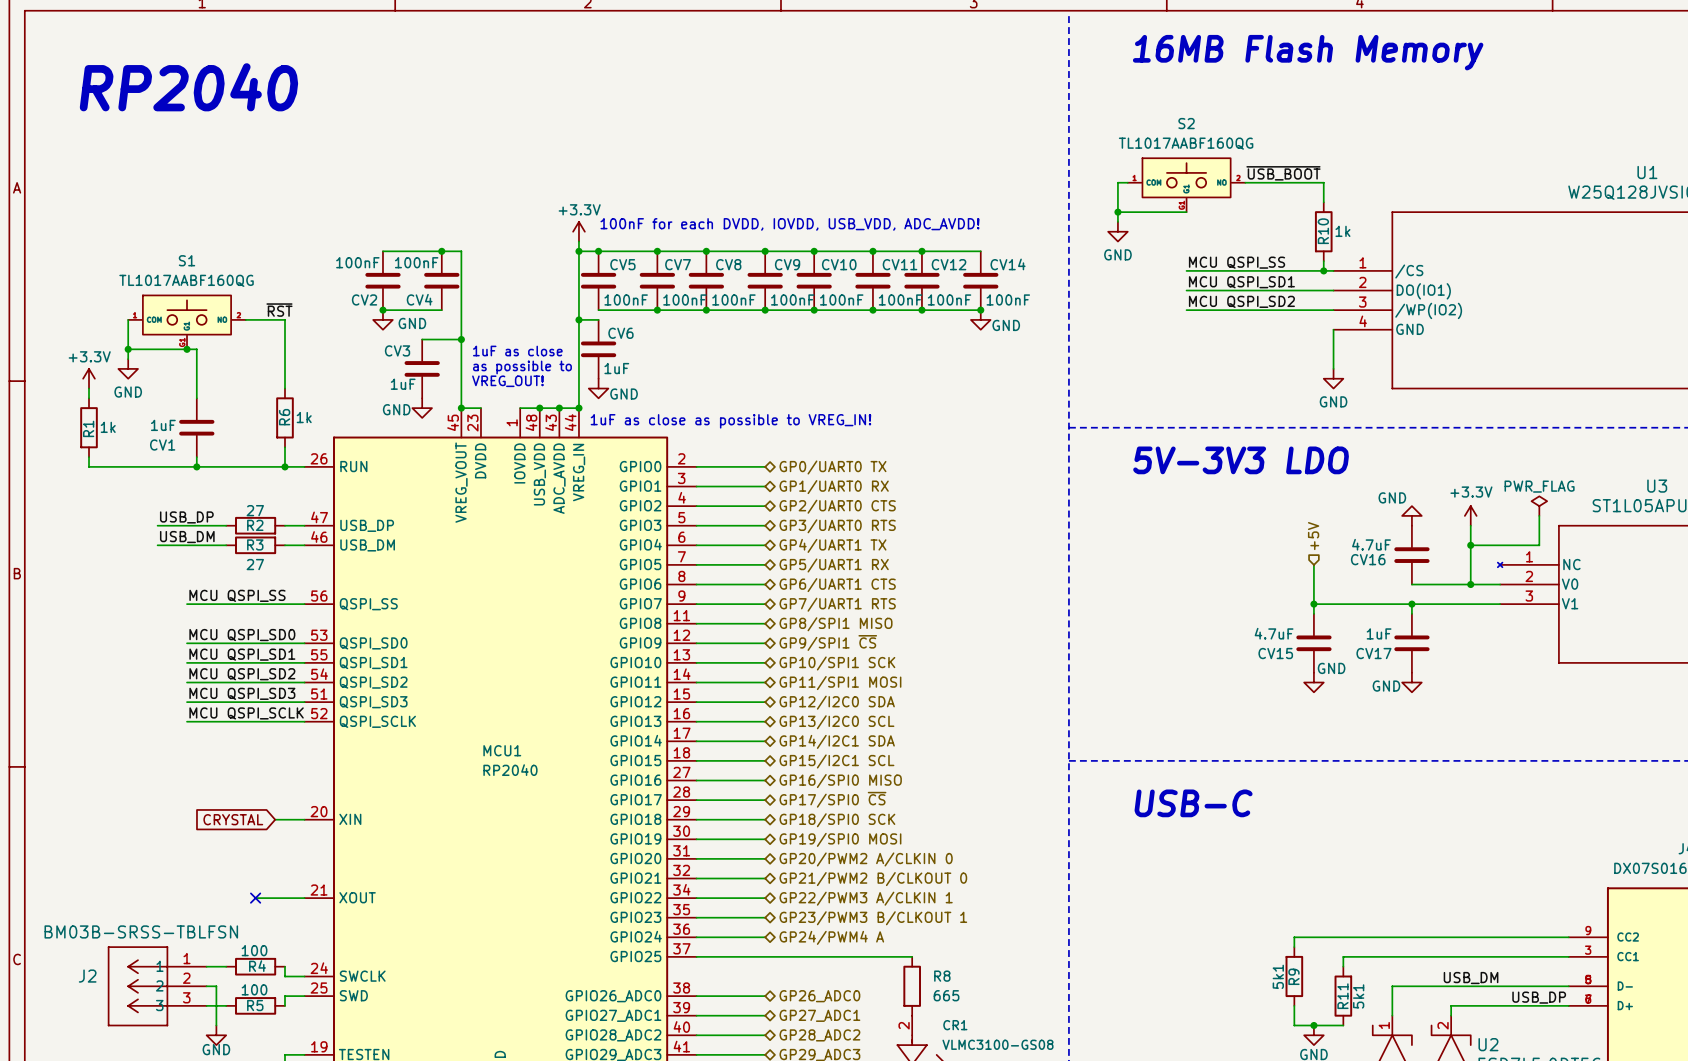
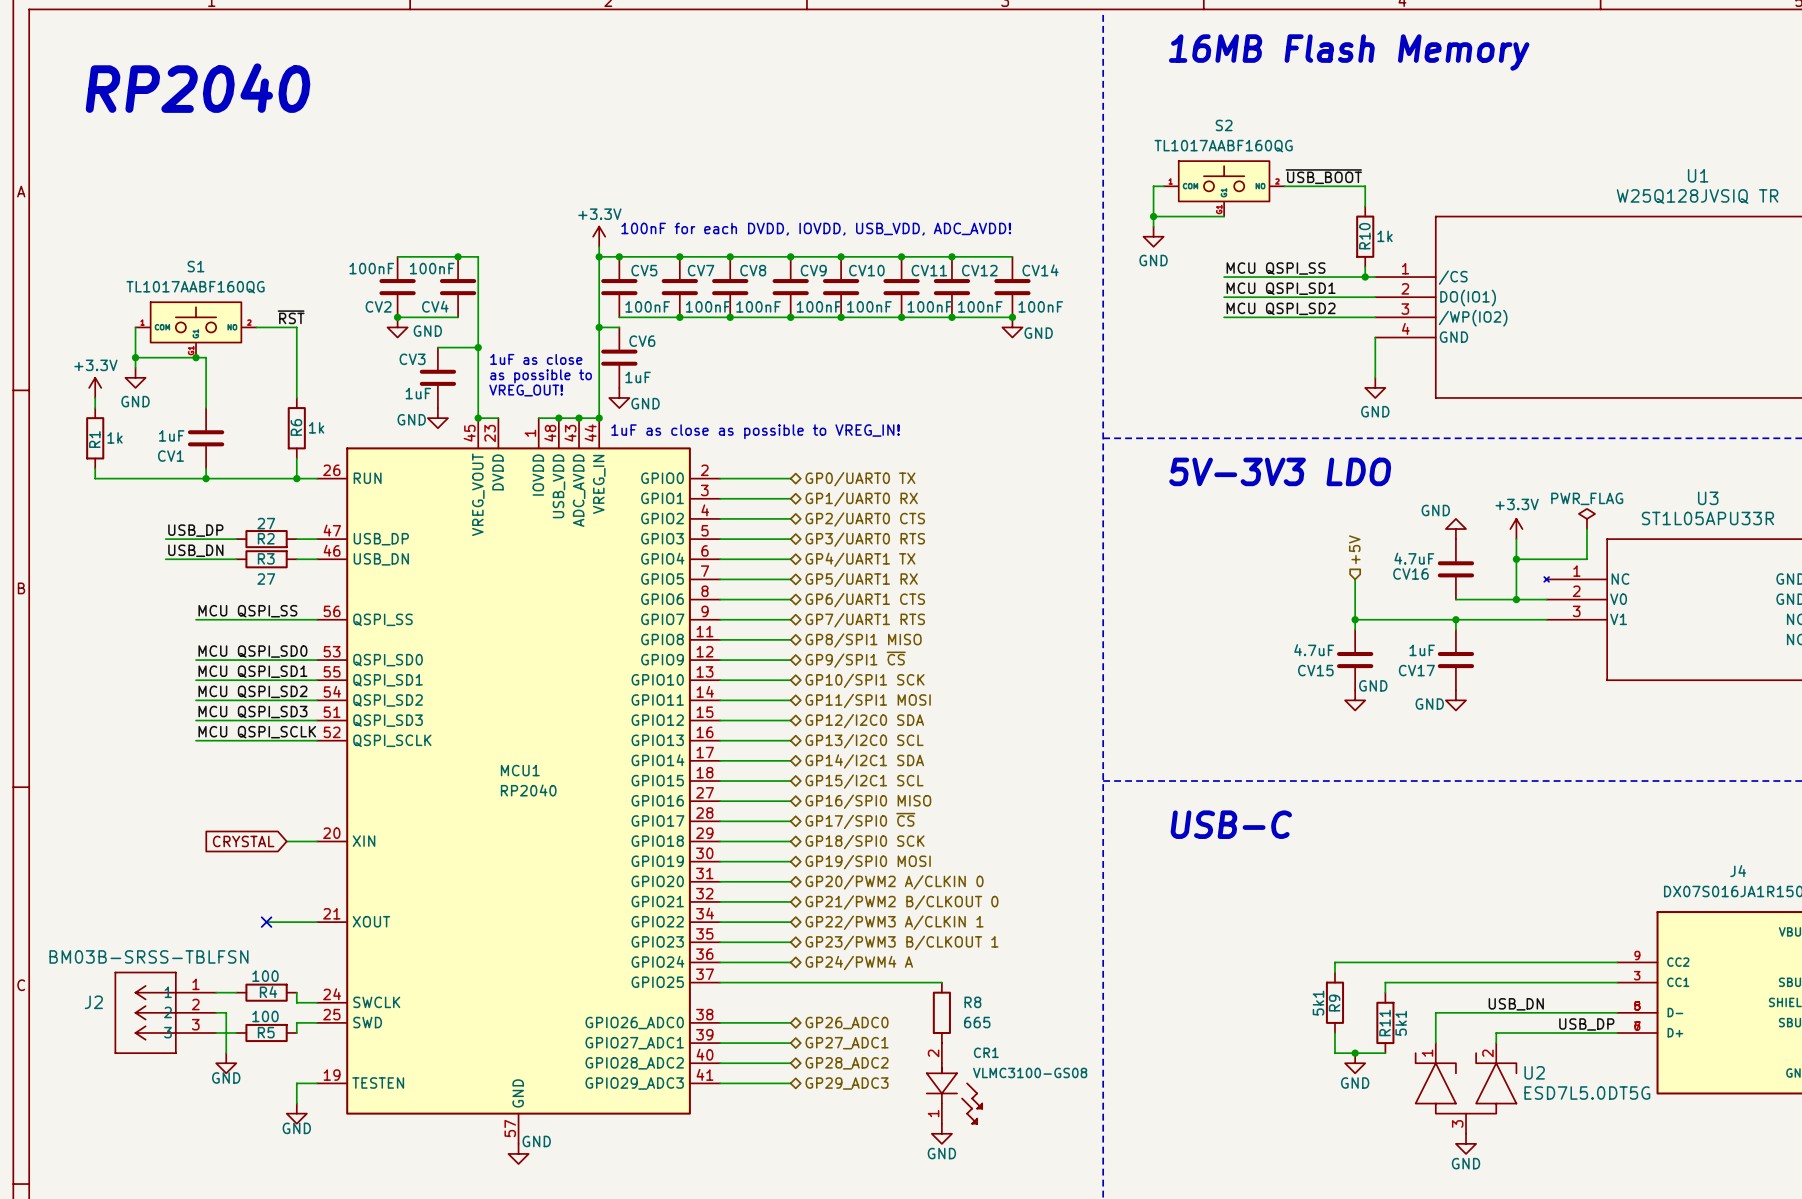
label: USB_DM (187, 537) -> USB_DN (195, 550)
MCU1 pin name: USB_DM (367, 545) -> USB_DN (381, 559)
label: USB_DM (1471, 978) -> USB_DN (1516, 1004)

